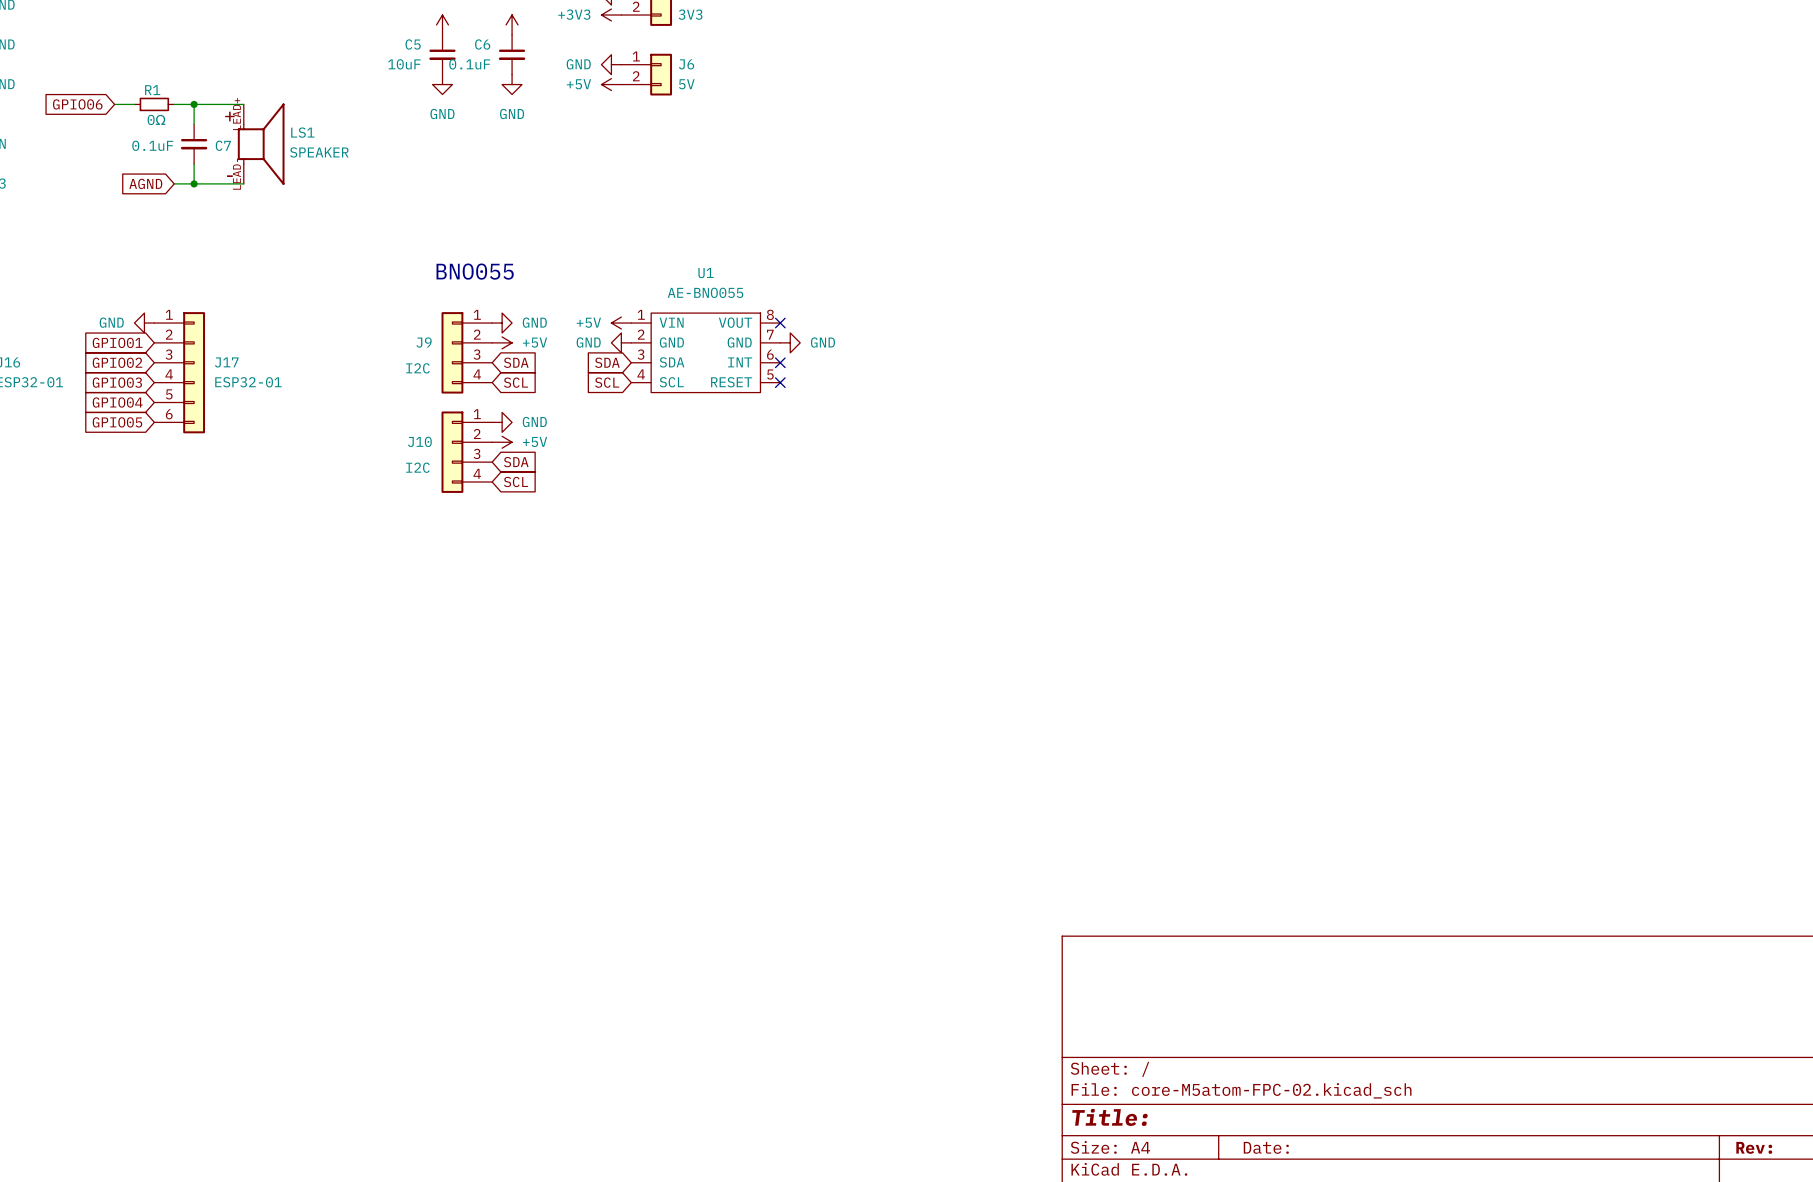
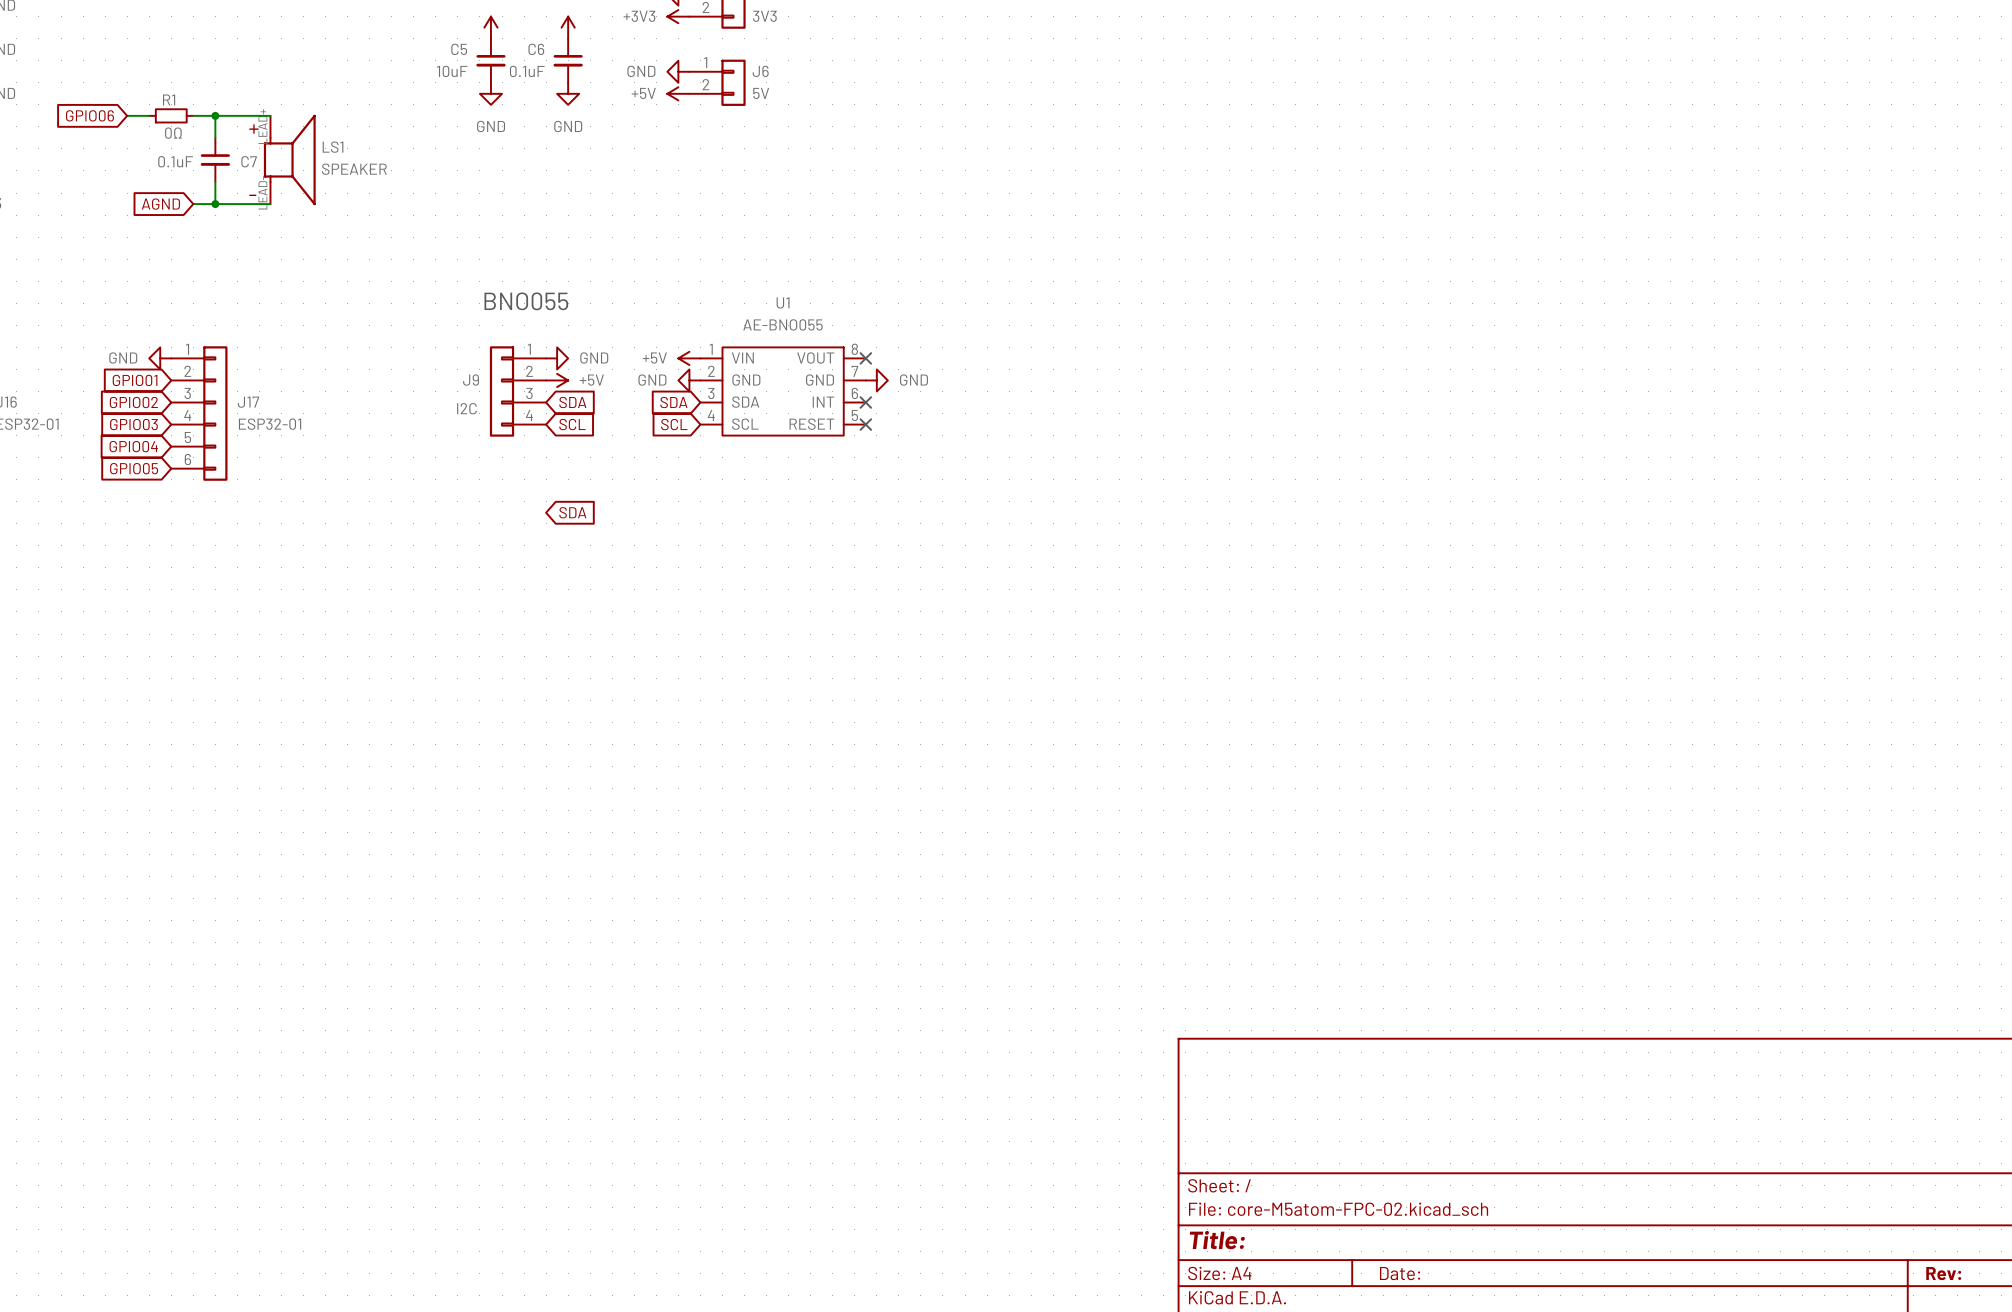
power symbol: GND (502, 422) -> none
power symbol: +5V (502, 442) -> none
J10: I2C (466, 452) -> none
global label: SCL (516, 482) -> none

